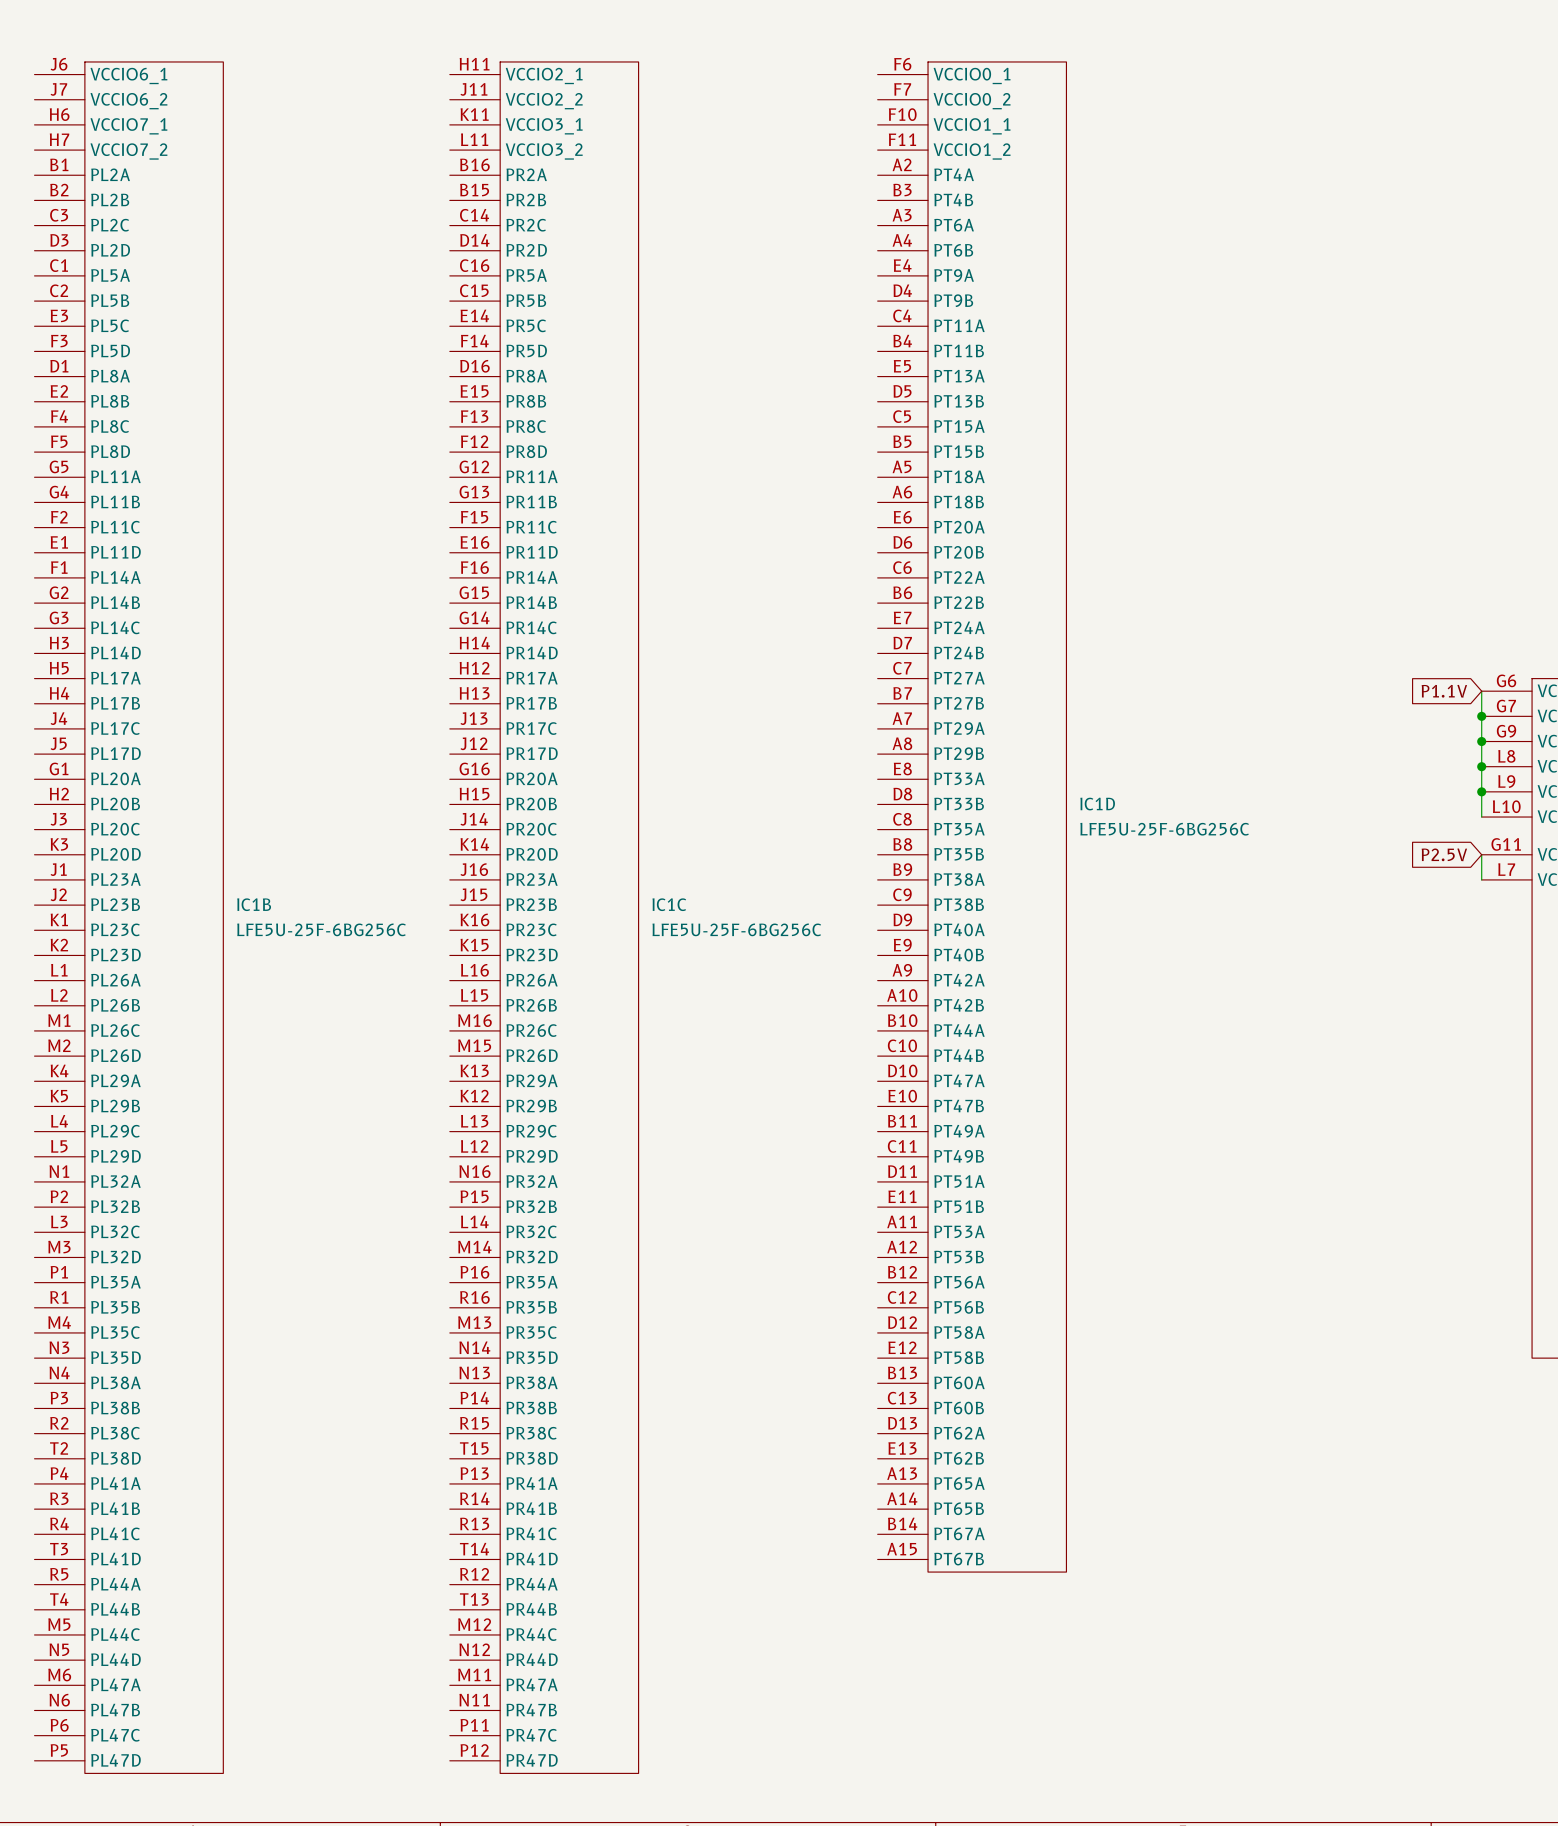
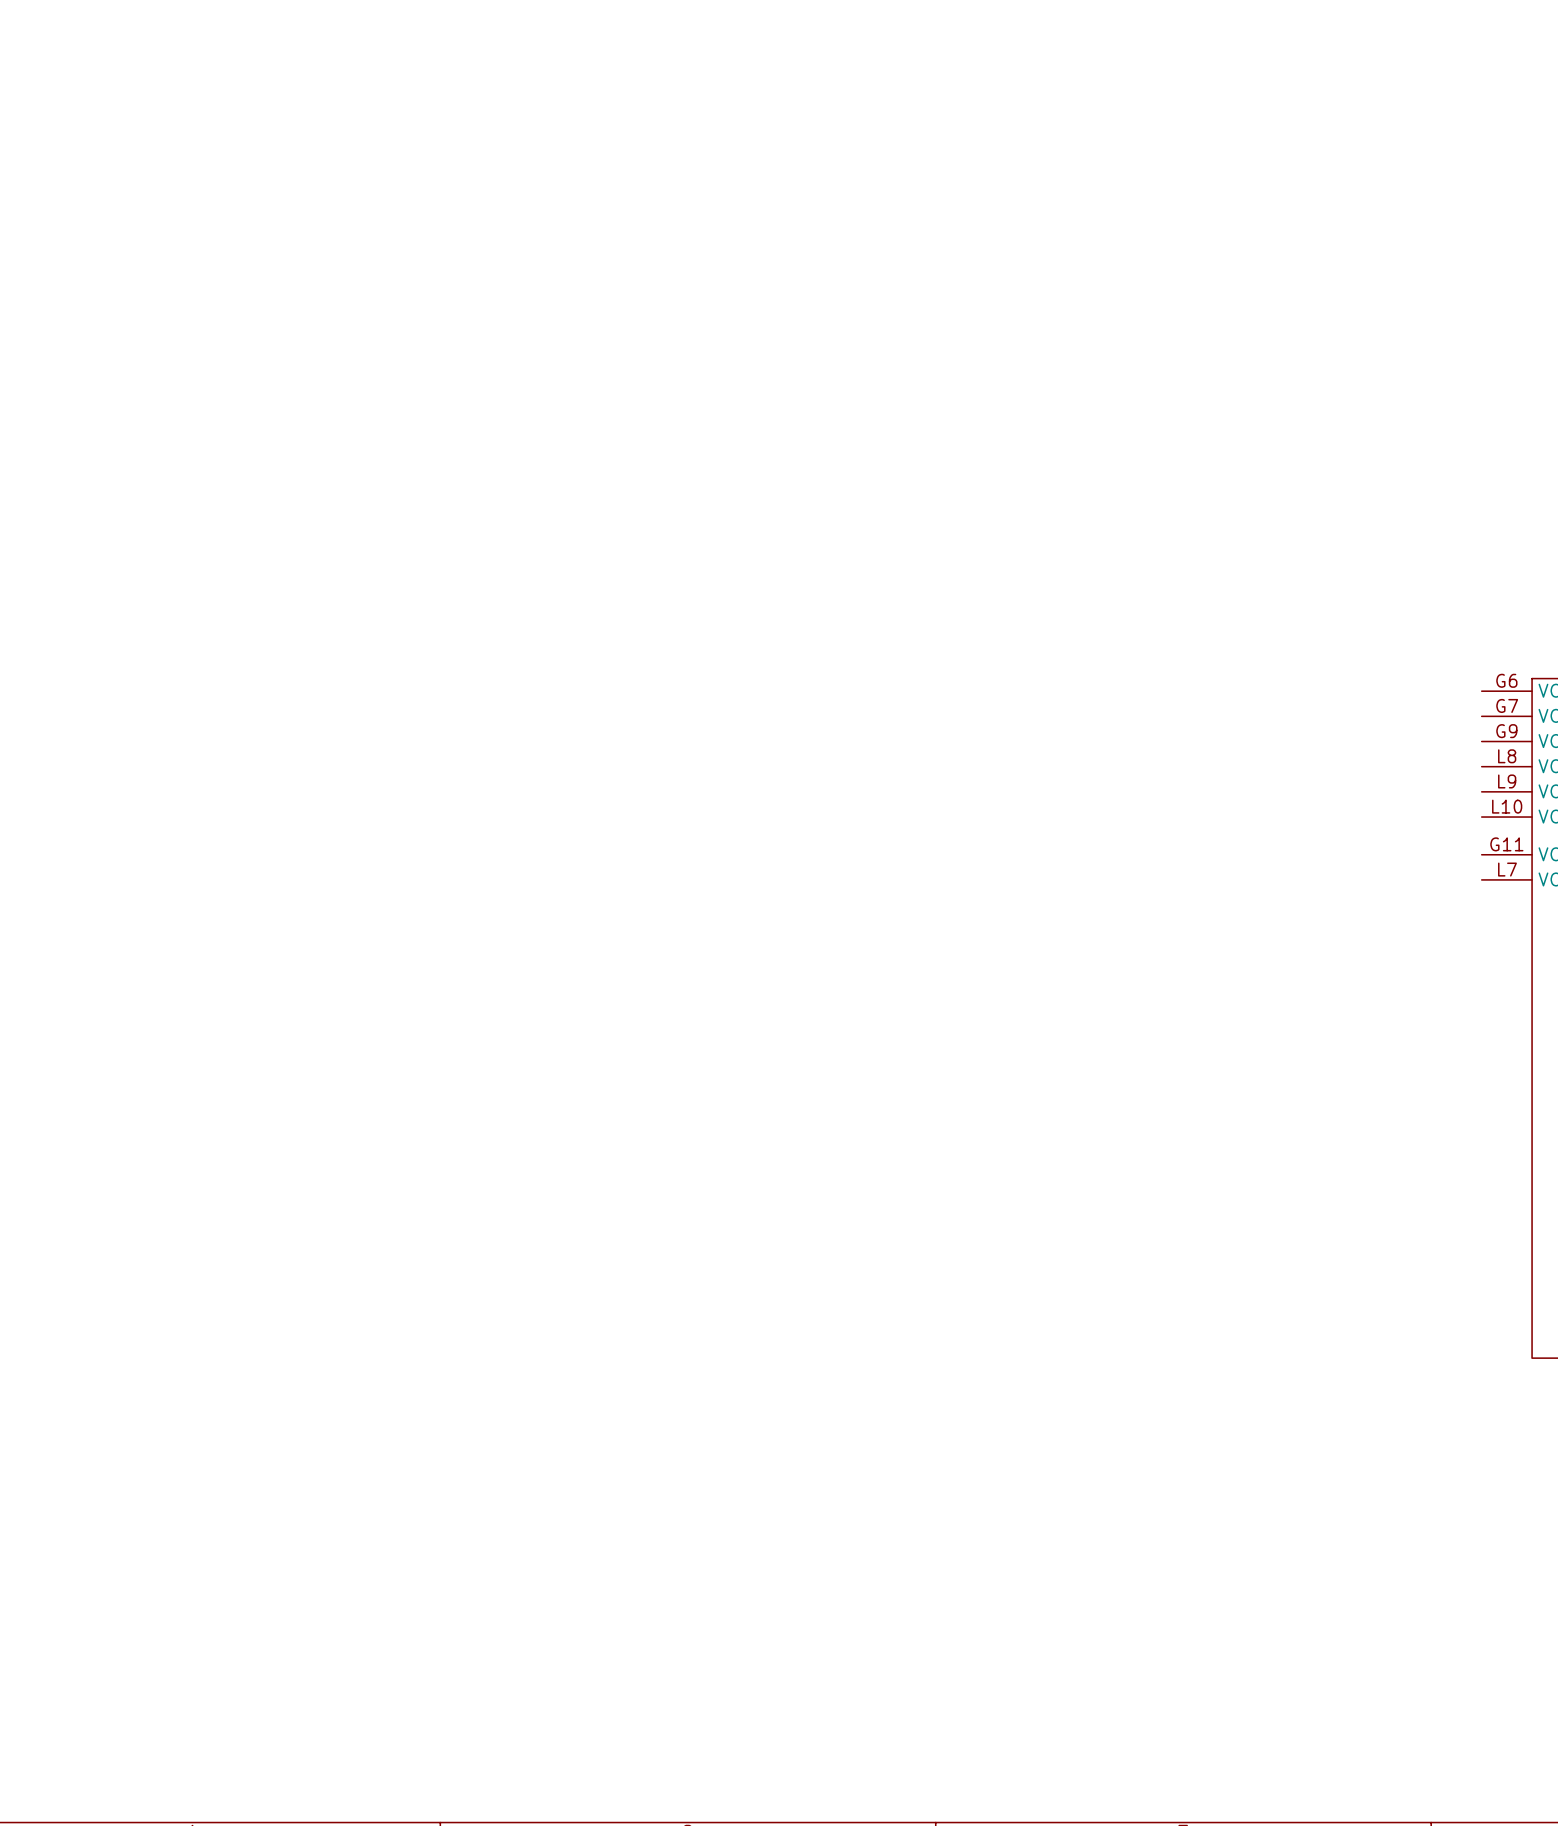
global label: P1.1V (1444, 691) -> none
wire: (1481, 691) (1481, 817) -> none
junction: (1481, 716) -> none
junction: (1481, 741) -> none
junction: (1481, 766) -> none
junction: (1481, 791) -> none
IC1D: LFE5U-25F-6BG256C (972, 817) -> none
global label: P2.5V (1444, 854) -> none
wire: (1481, 854) (1481, 879) -> none
IC1B: LFE5U-25F-6BG256C (128, 917) -> none
IC1C: LFE5U-25F-6BG256C (544, 917) -> none

